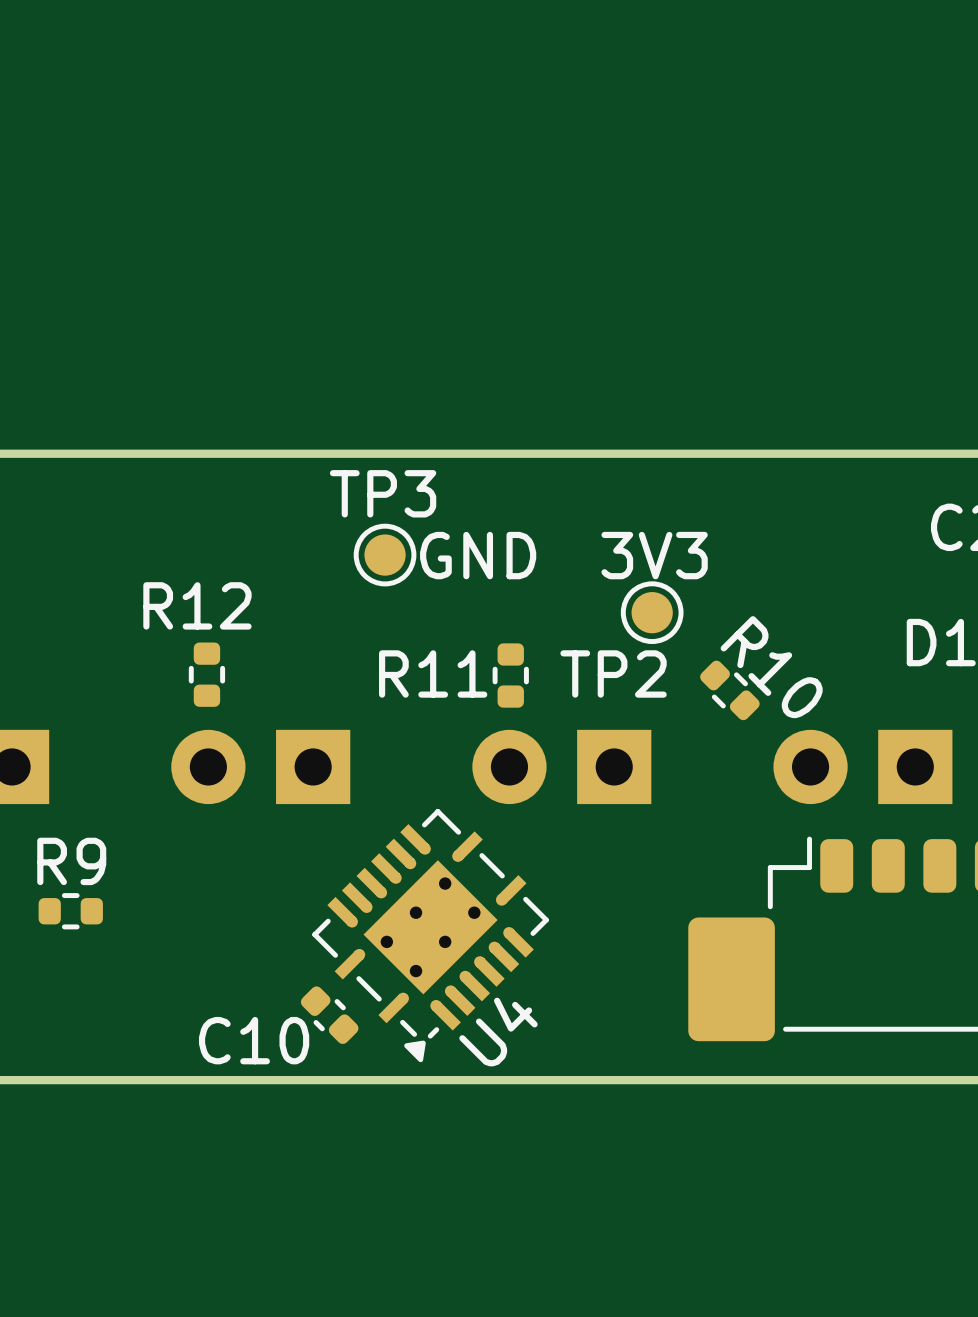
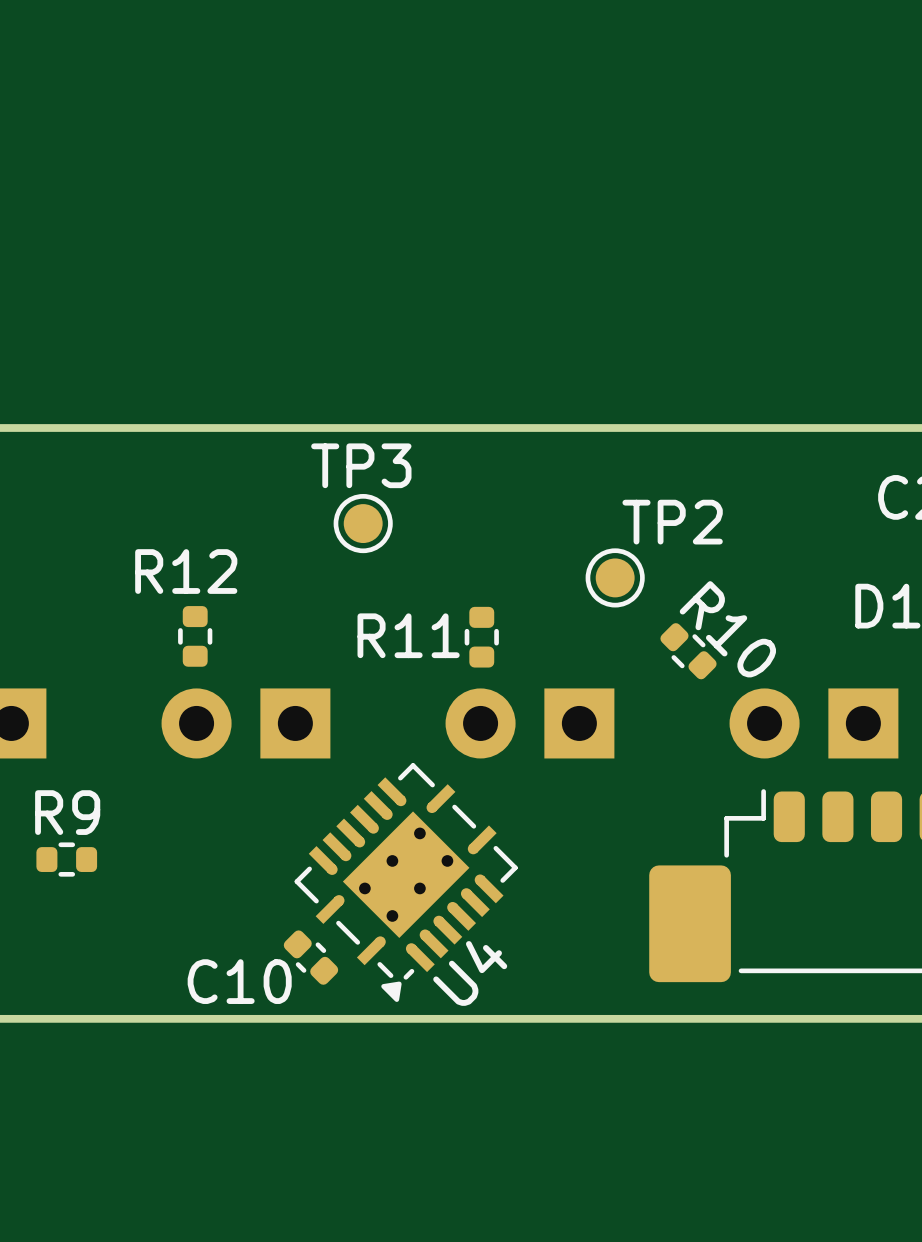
text: GND (478, 555) -> none
text: 3V3 (654, 555) -> none
TP2 name position: TP2 (613, 673) -> TP2 (672, 522)

